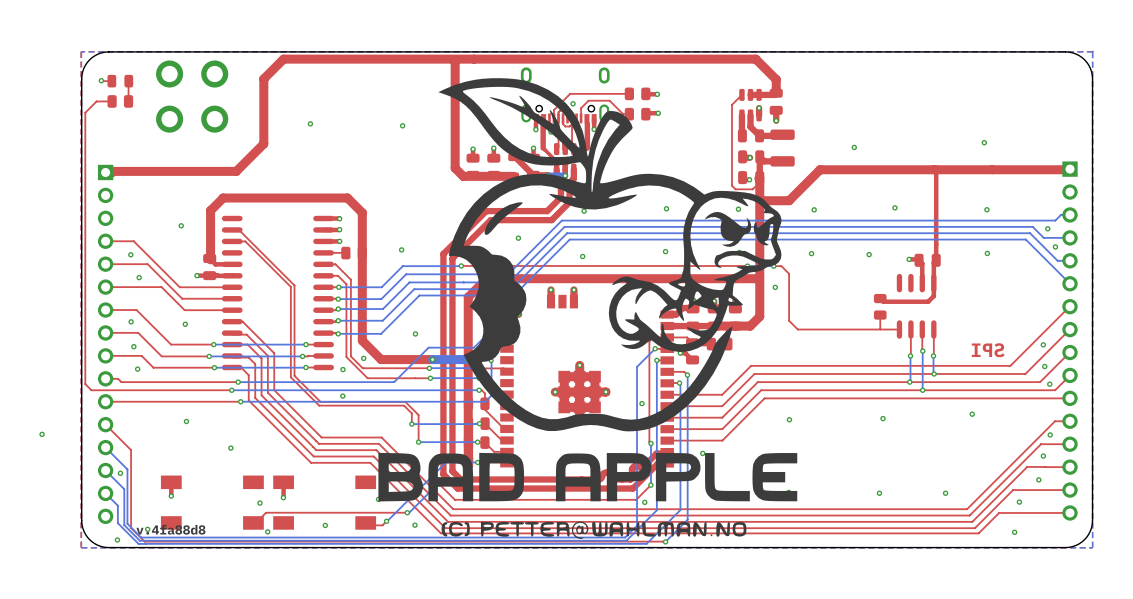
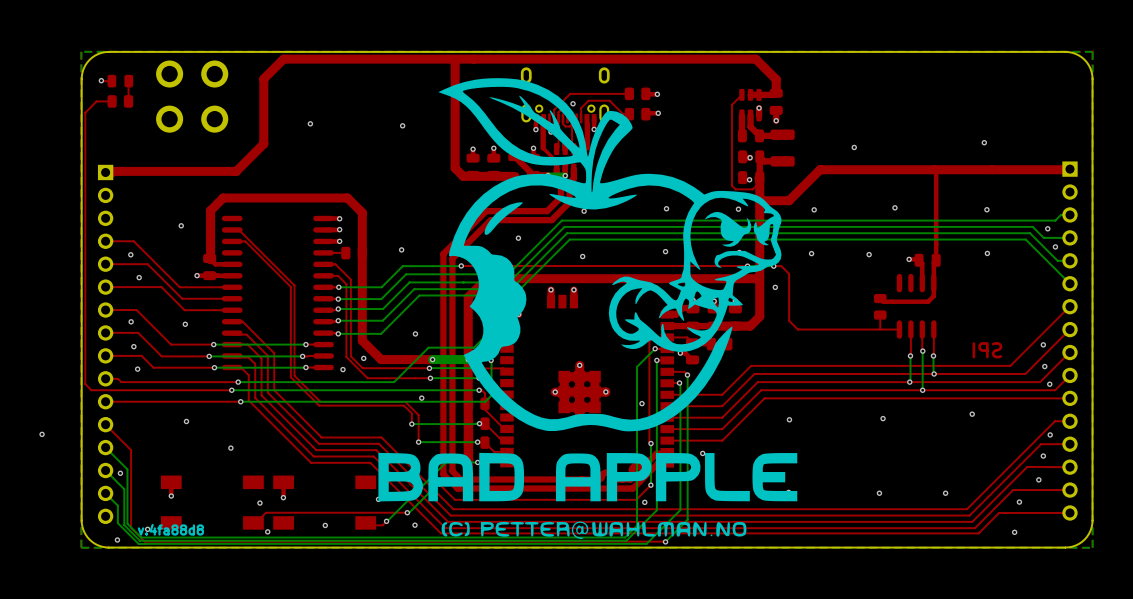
via: (342, 396) -> none
via: none -> (421, 398)

